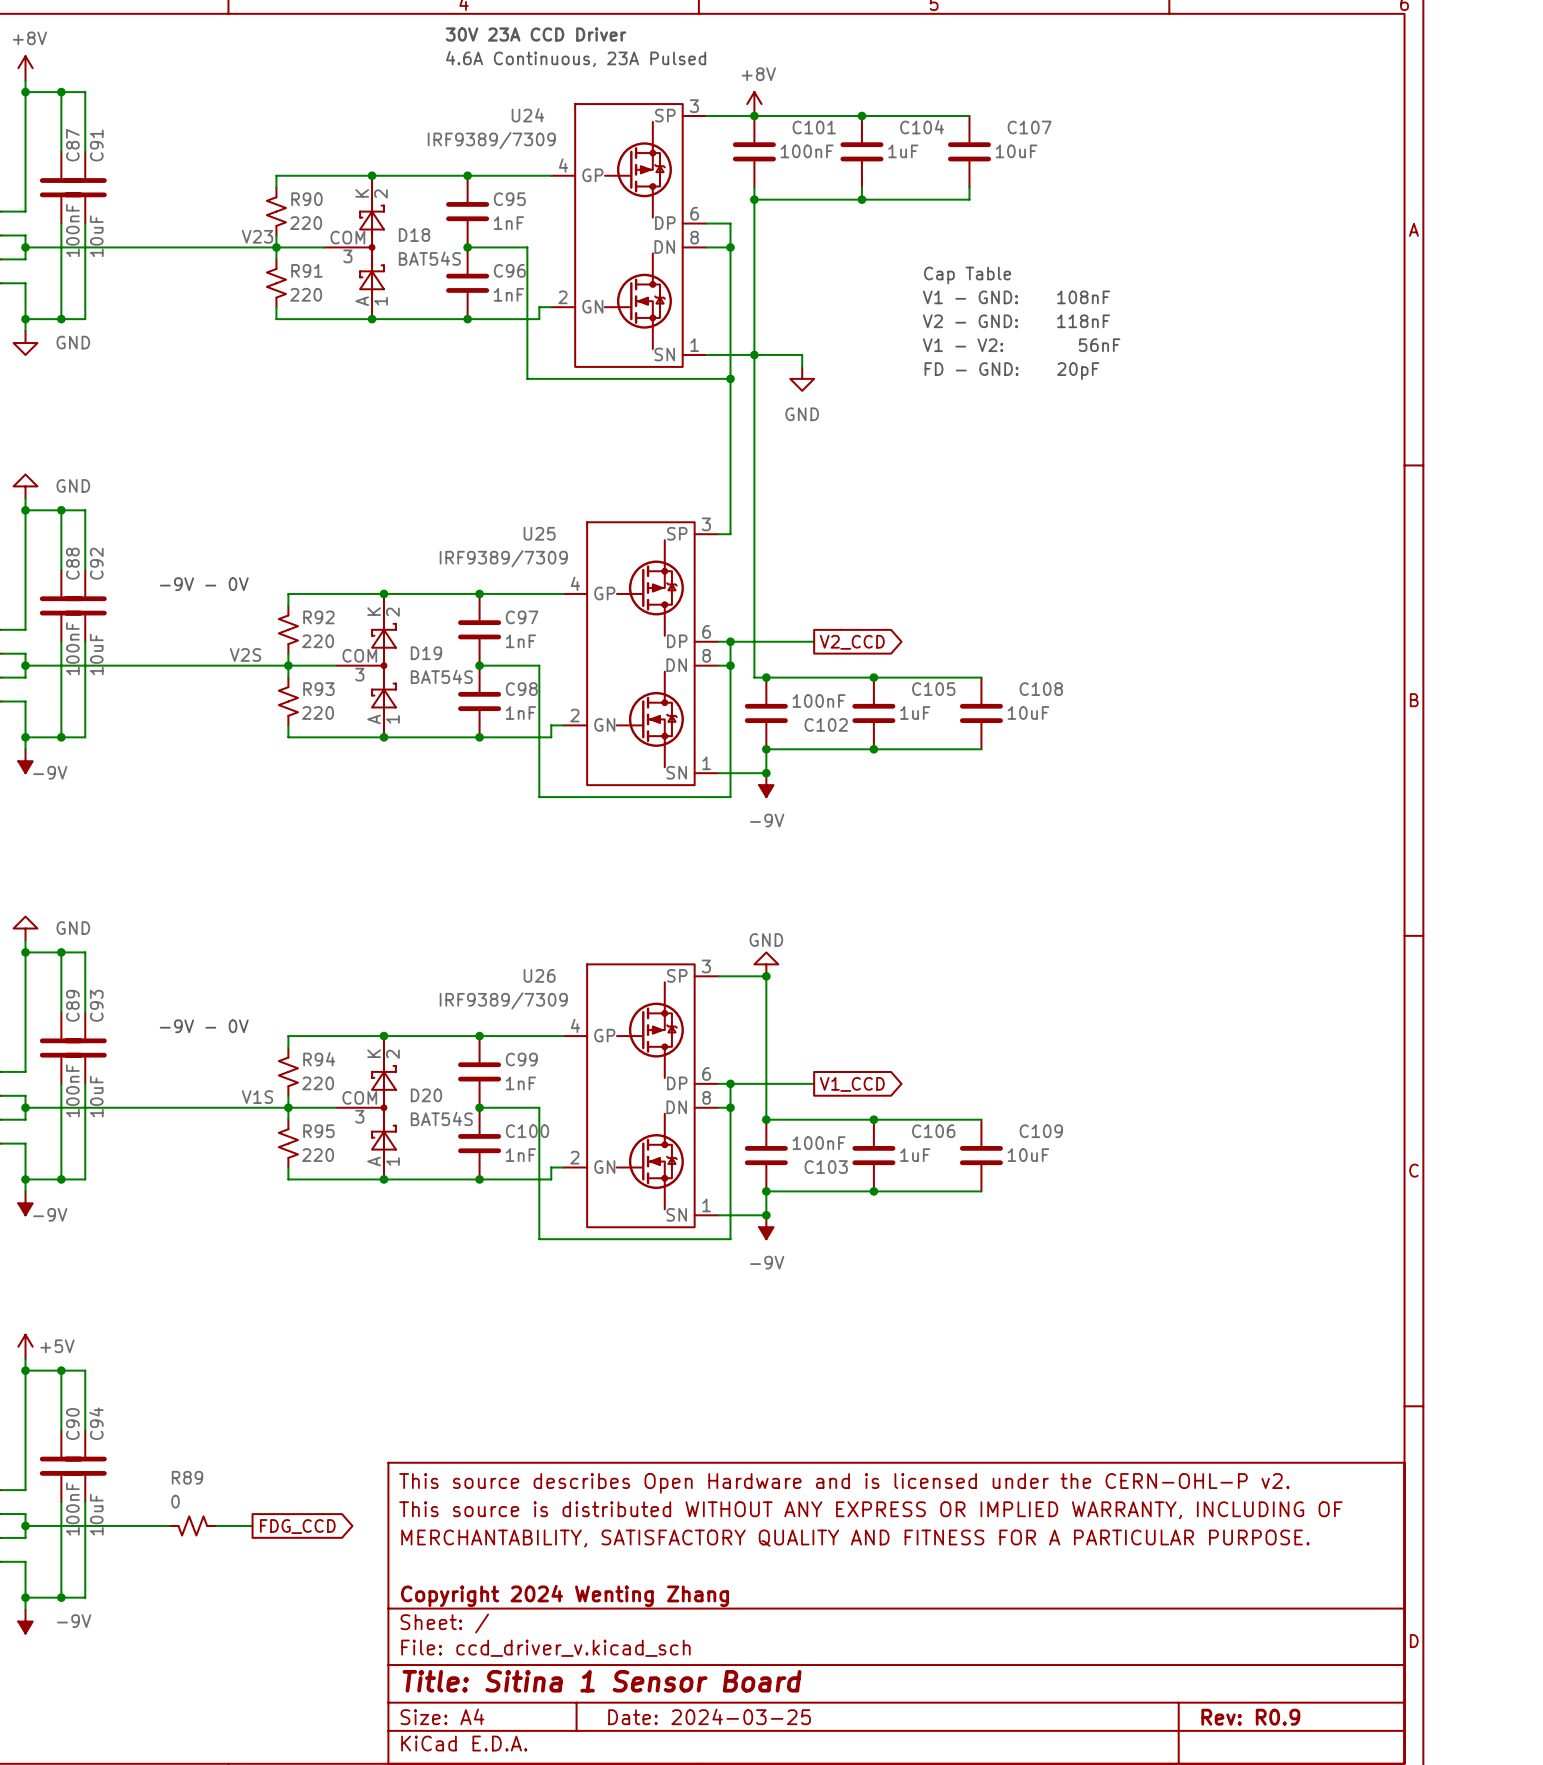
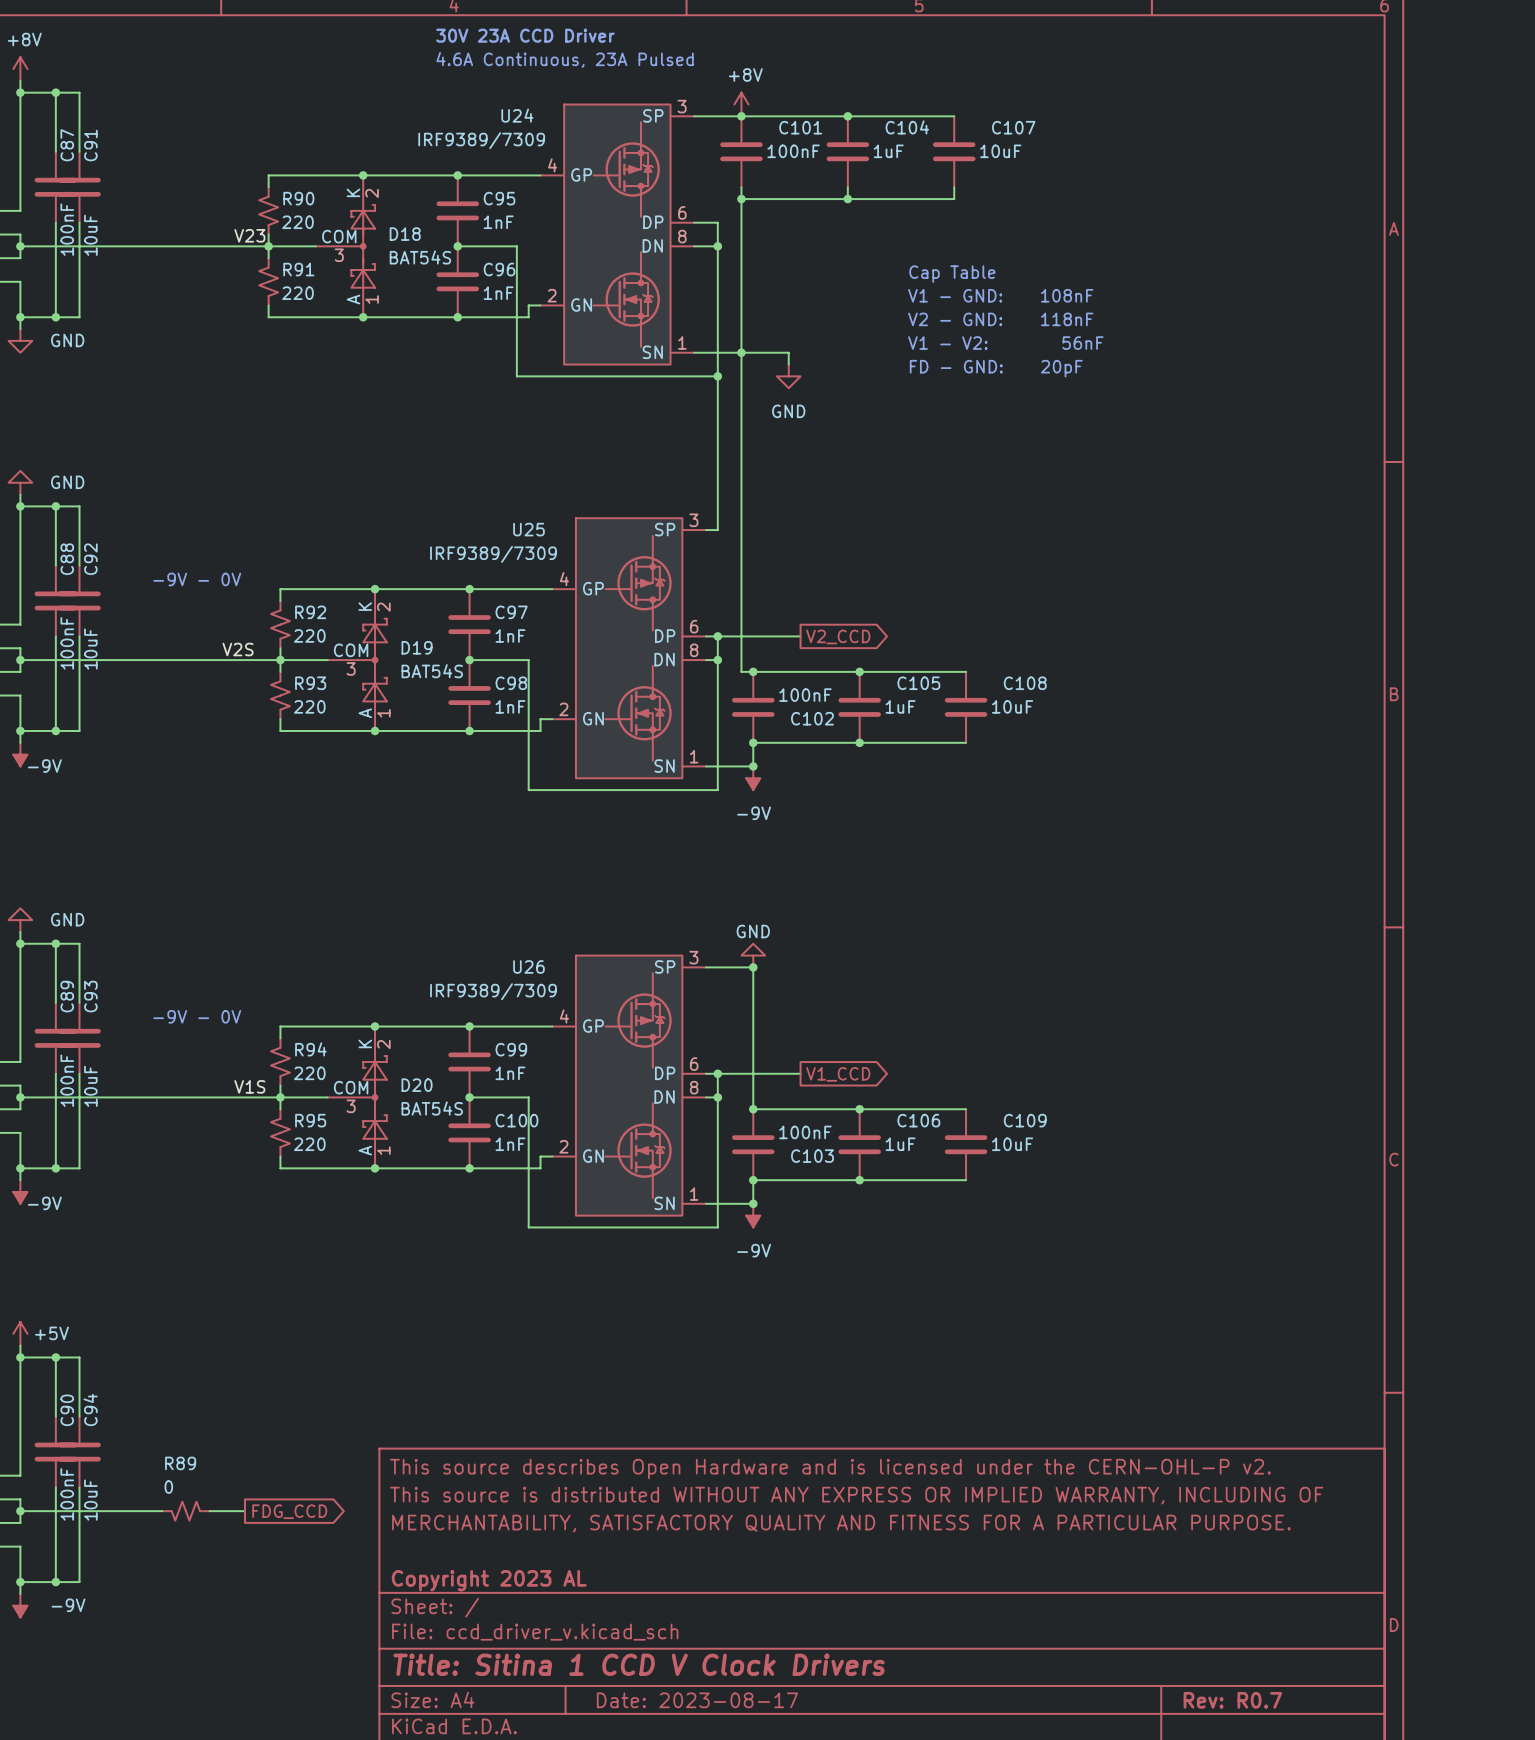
title block: Copyright 2024 Wenting Zhang (564, 1595) -> Copyright 2023 AL (489, 1580)
title block: Title: Sitina 1 Sensor Board (602, 1681) -> Title: Sitina 1 CCD V Clock Drivers (639, 1664)
title block: Date: 2024-03-25 (709, 1716) -> Date: 2023-08-17 (697, 1700)
title block: Rev: R0.9 (1250, 1717) -> Rev: R0.7 (1232, 1700)

